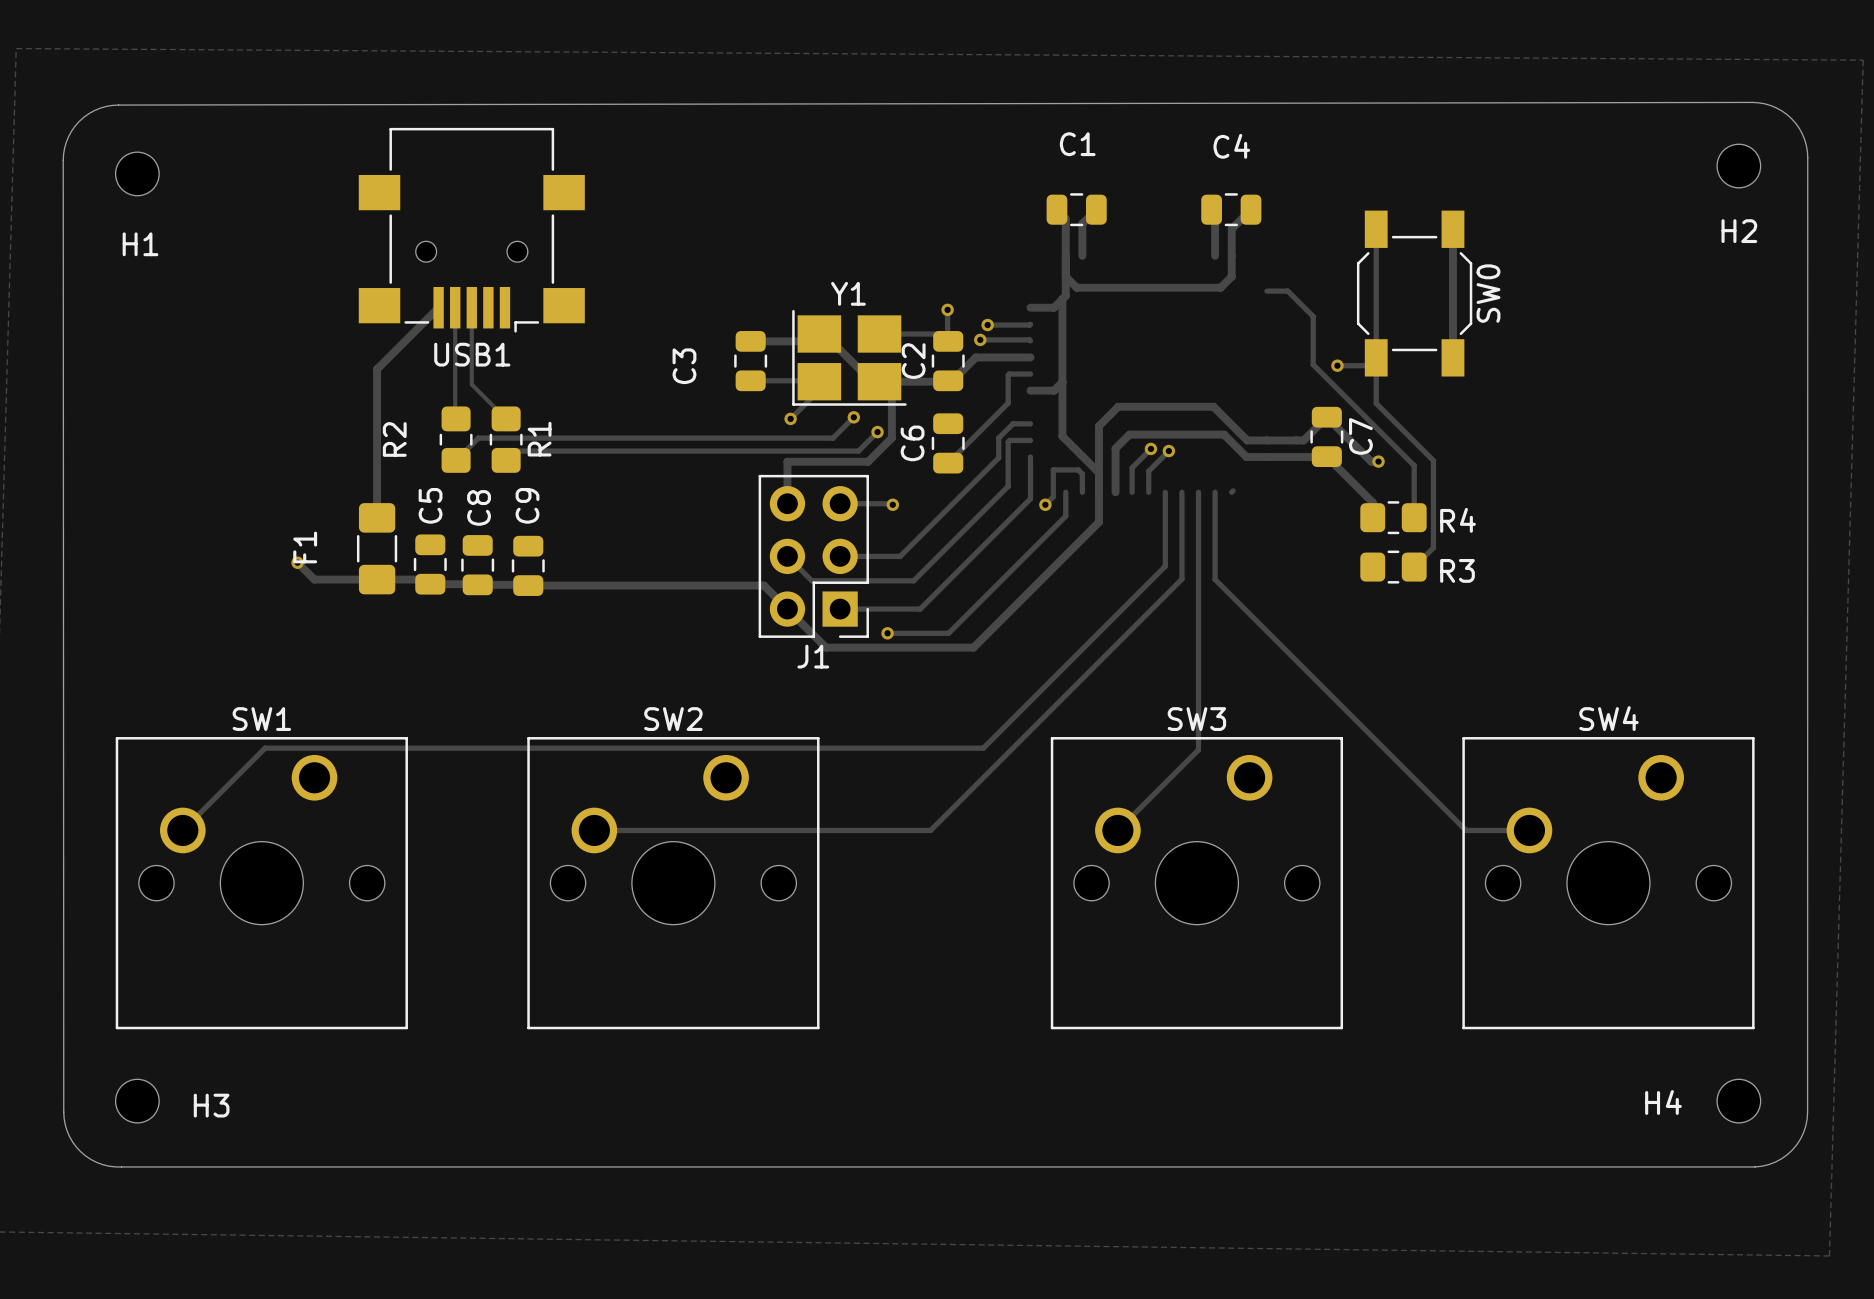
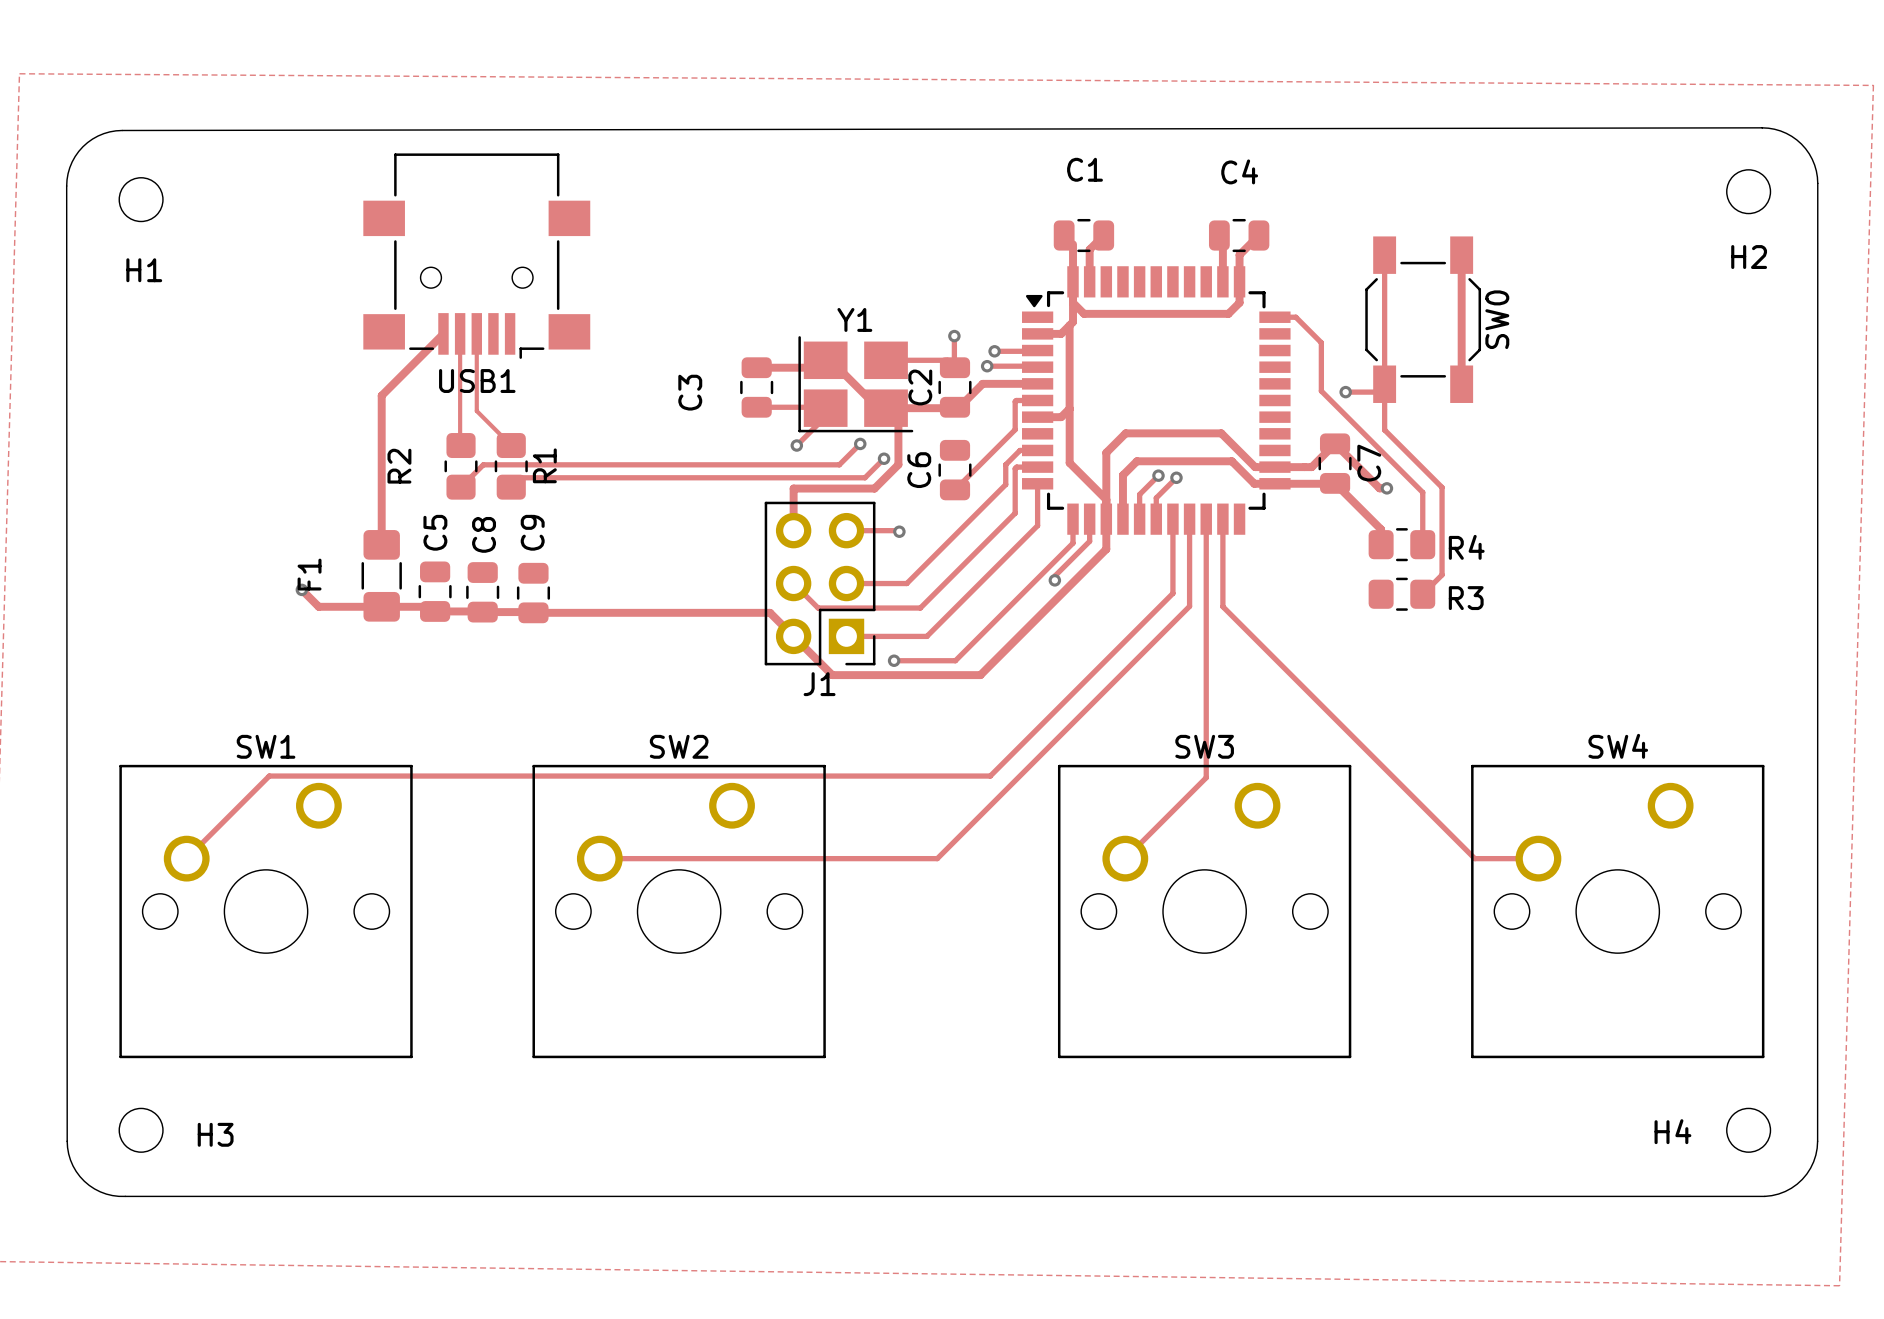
part: none -> (1156, 400)
track: (1082, 492) (1082, 474) (1078, 469) (1053, 469) (1053, 496) (1045, 504) -> (1089, 519) (1089, 541) (1054, 576) (1054, 580)
via position: (1045, 504) -> (1054, 580)

